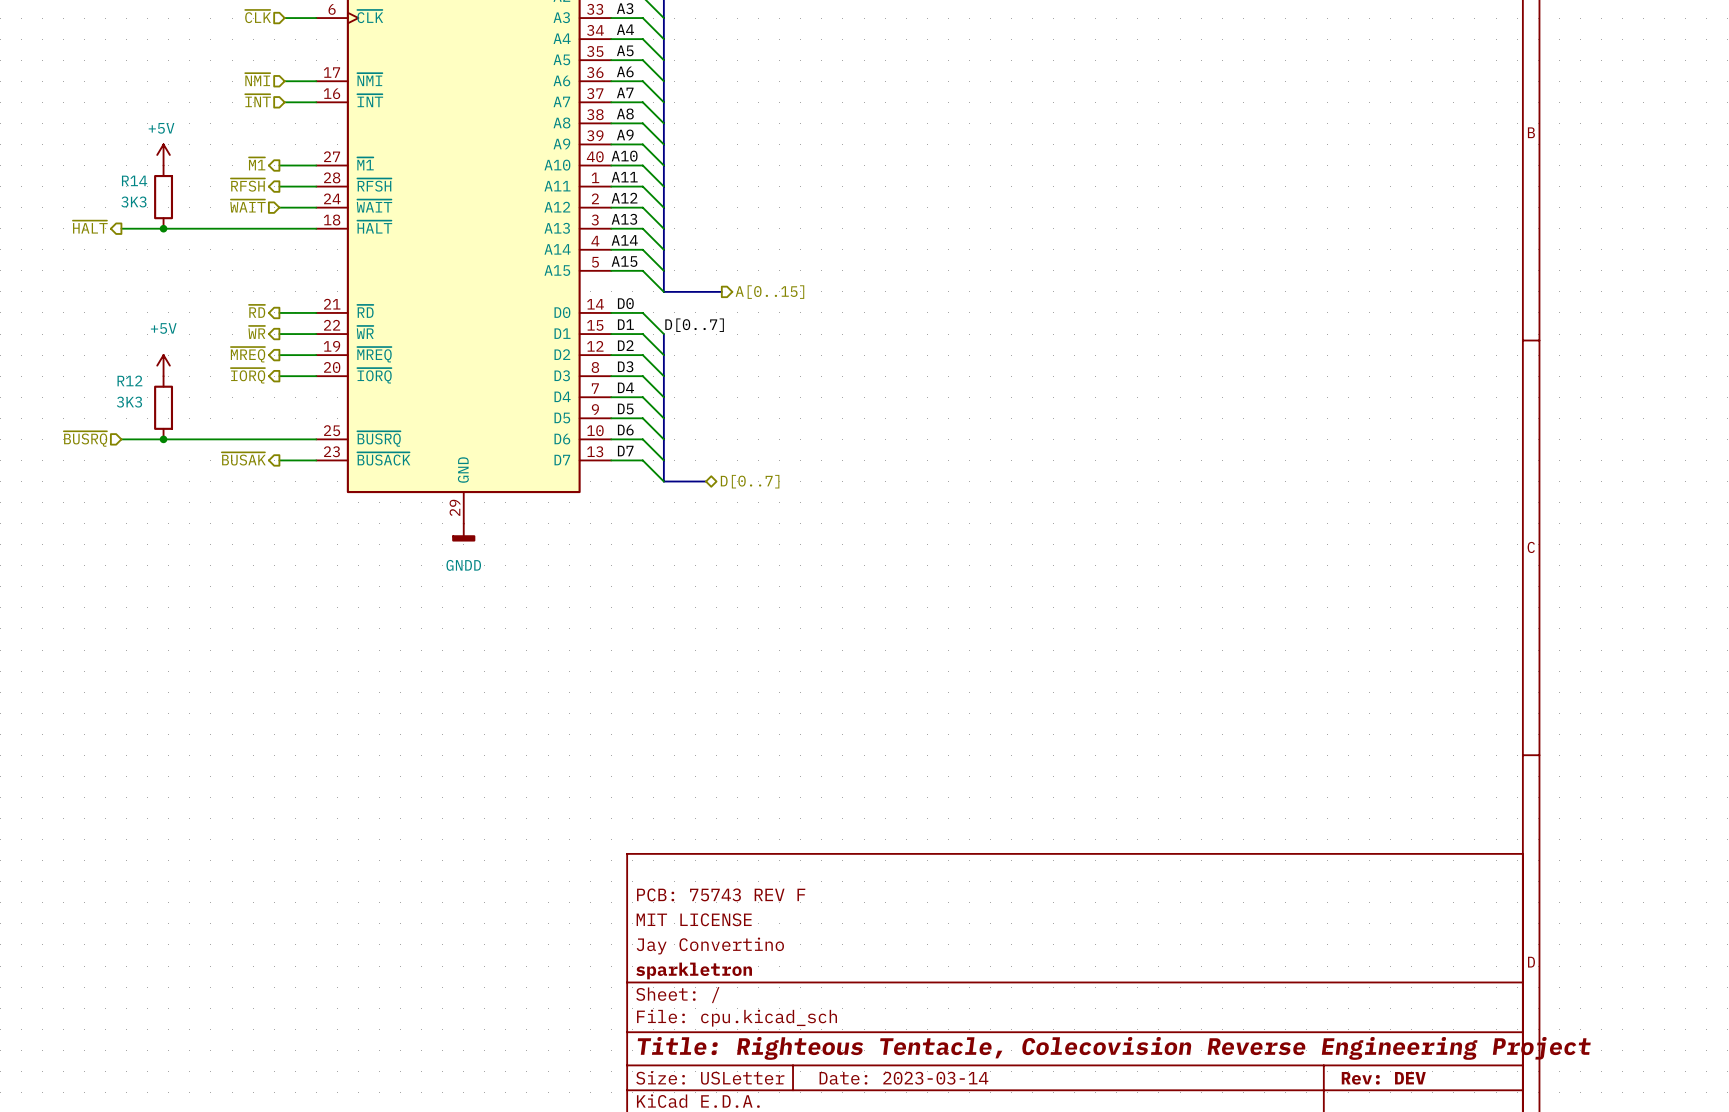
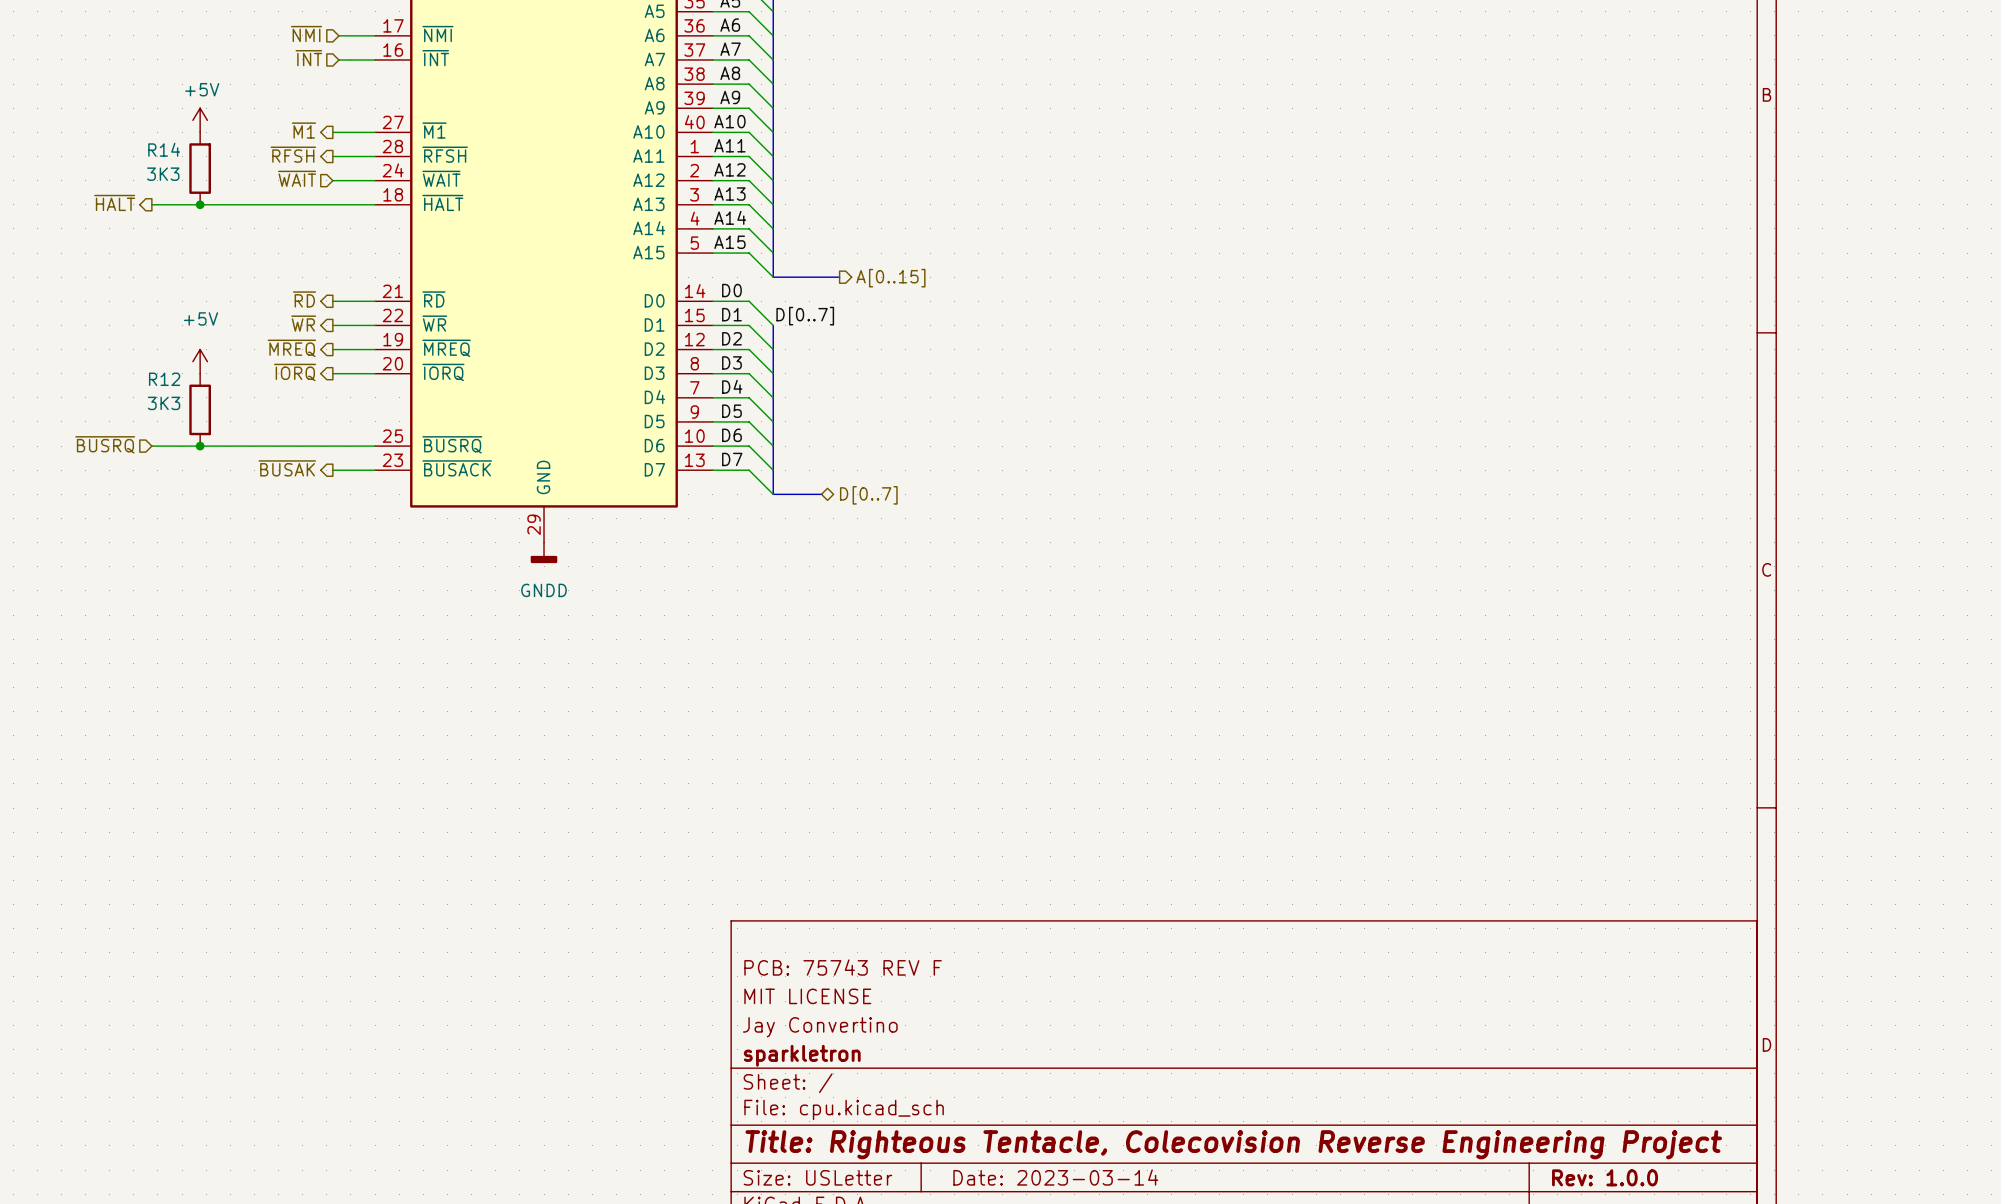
title block: Rev: DEV (1383, 1078) -> Rev: 1.0.0 (1605, 1177)

